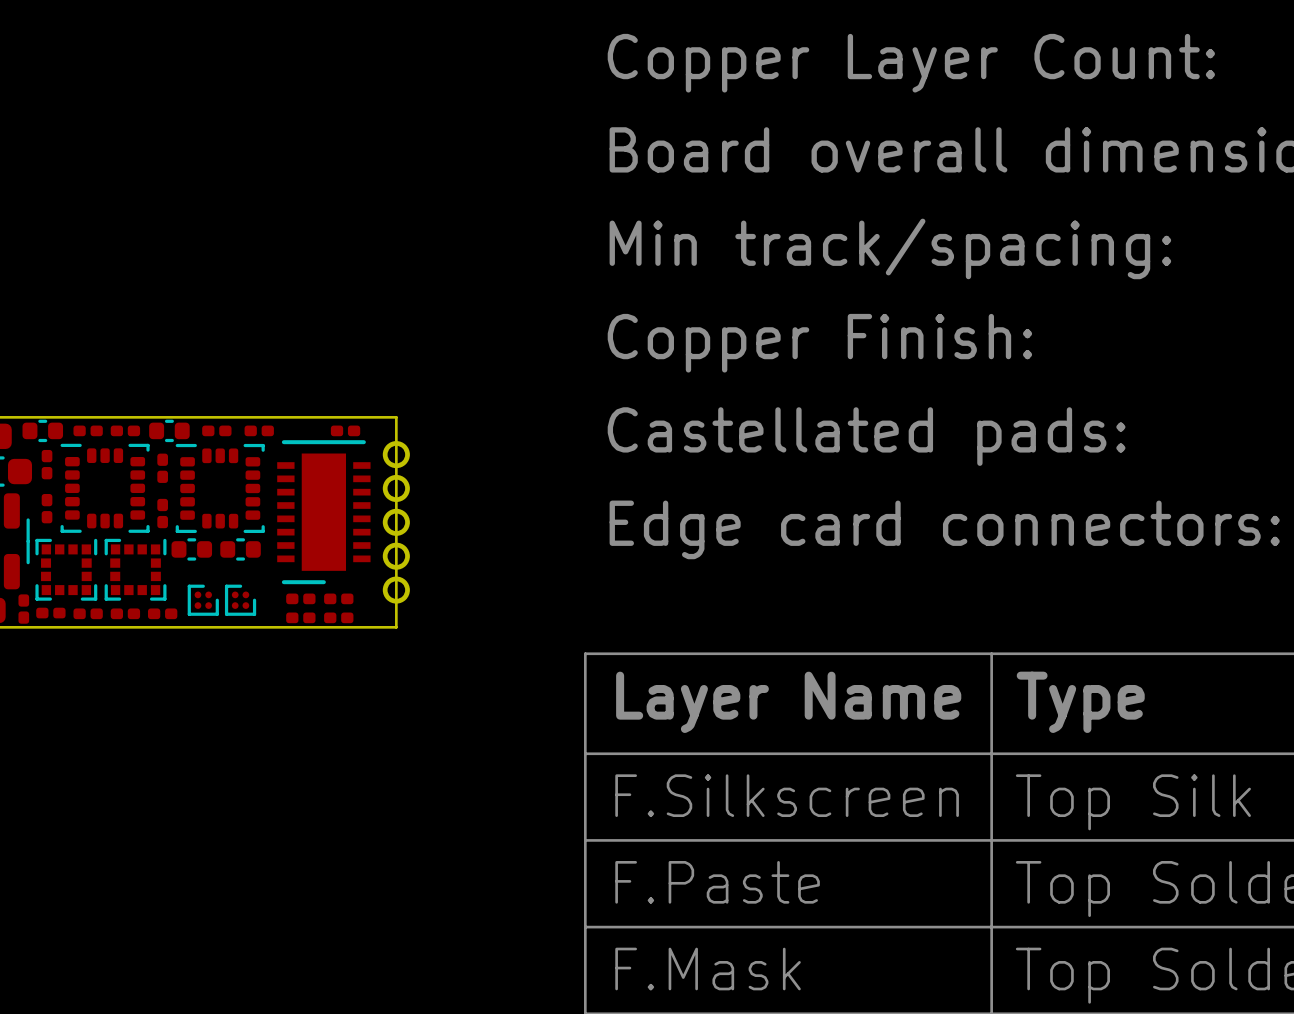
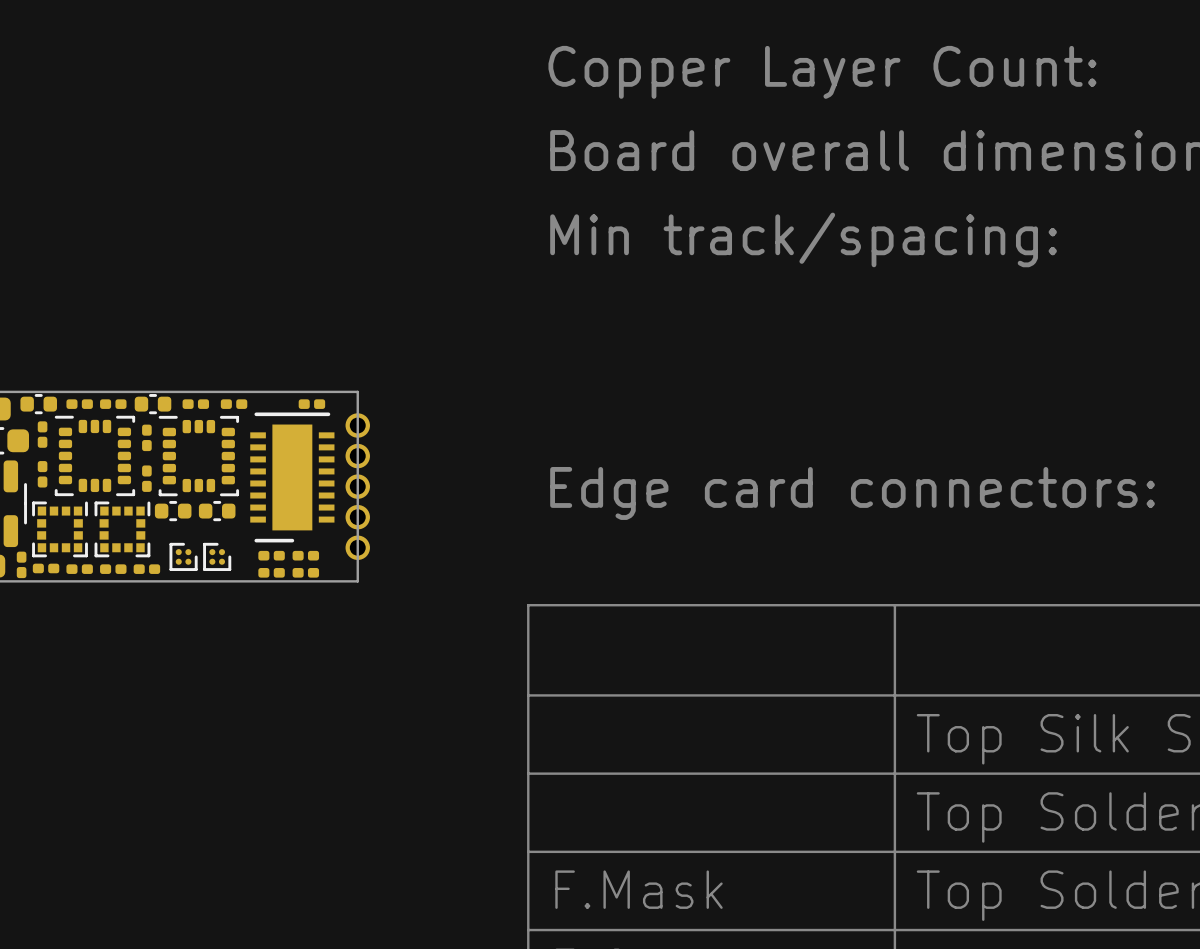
text: Copper Finish: (819, 343) -> none
text: Castellated pads: (866, 436) -> none
text: Layer Name (788, 702) -> none
text: Type (1080, 702) -> none
text: F.Silkscreen (787, 795) -> none
text: F.Paste (717, 882) -> none

